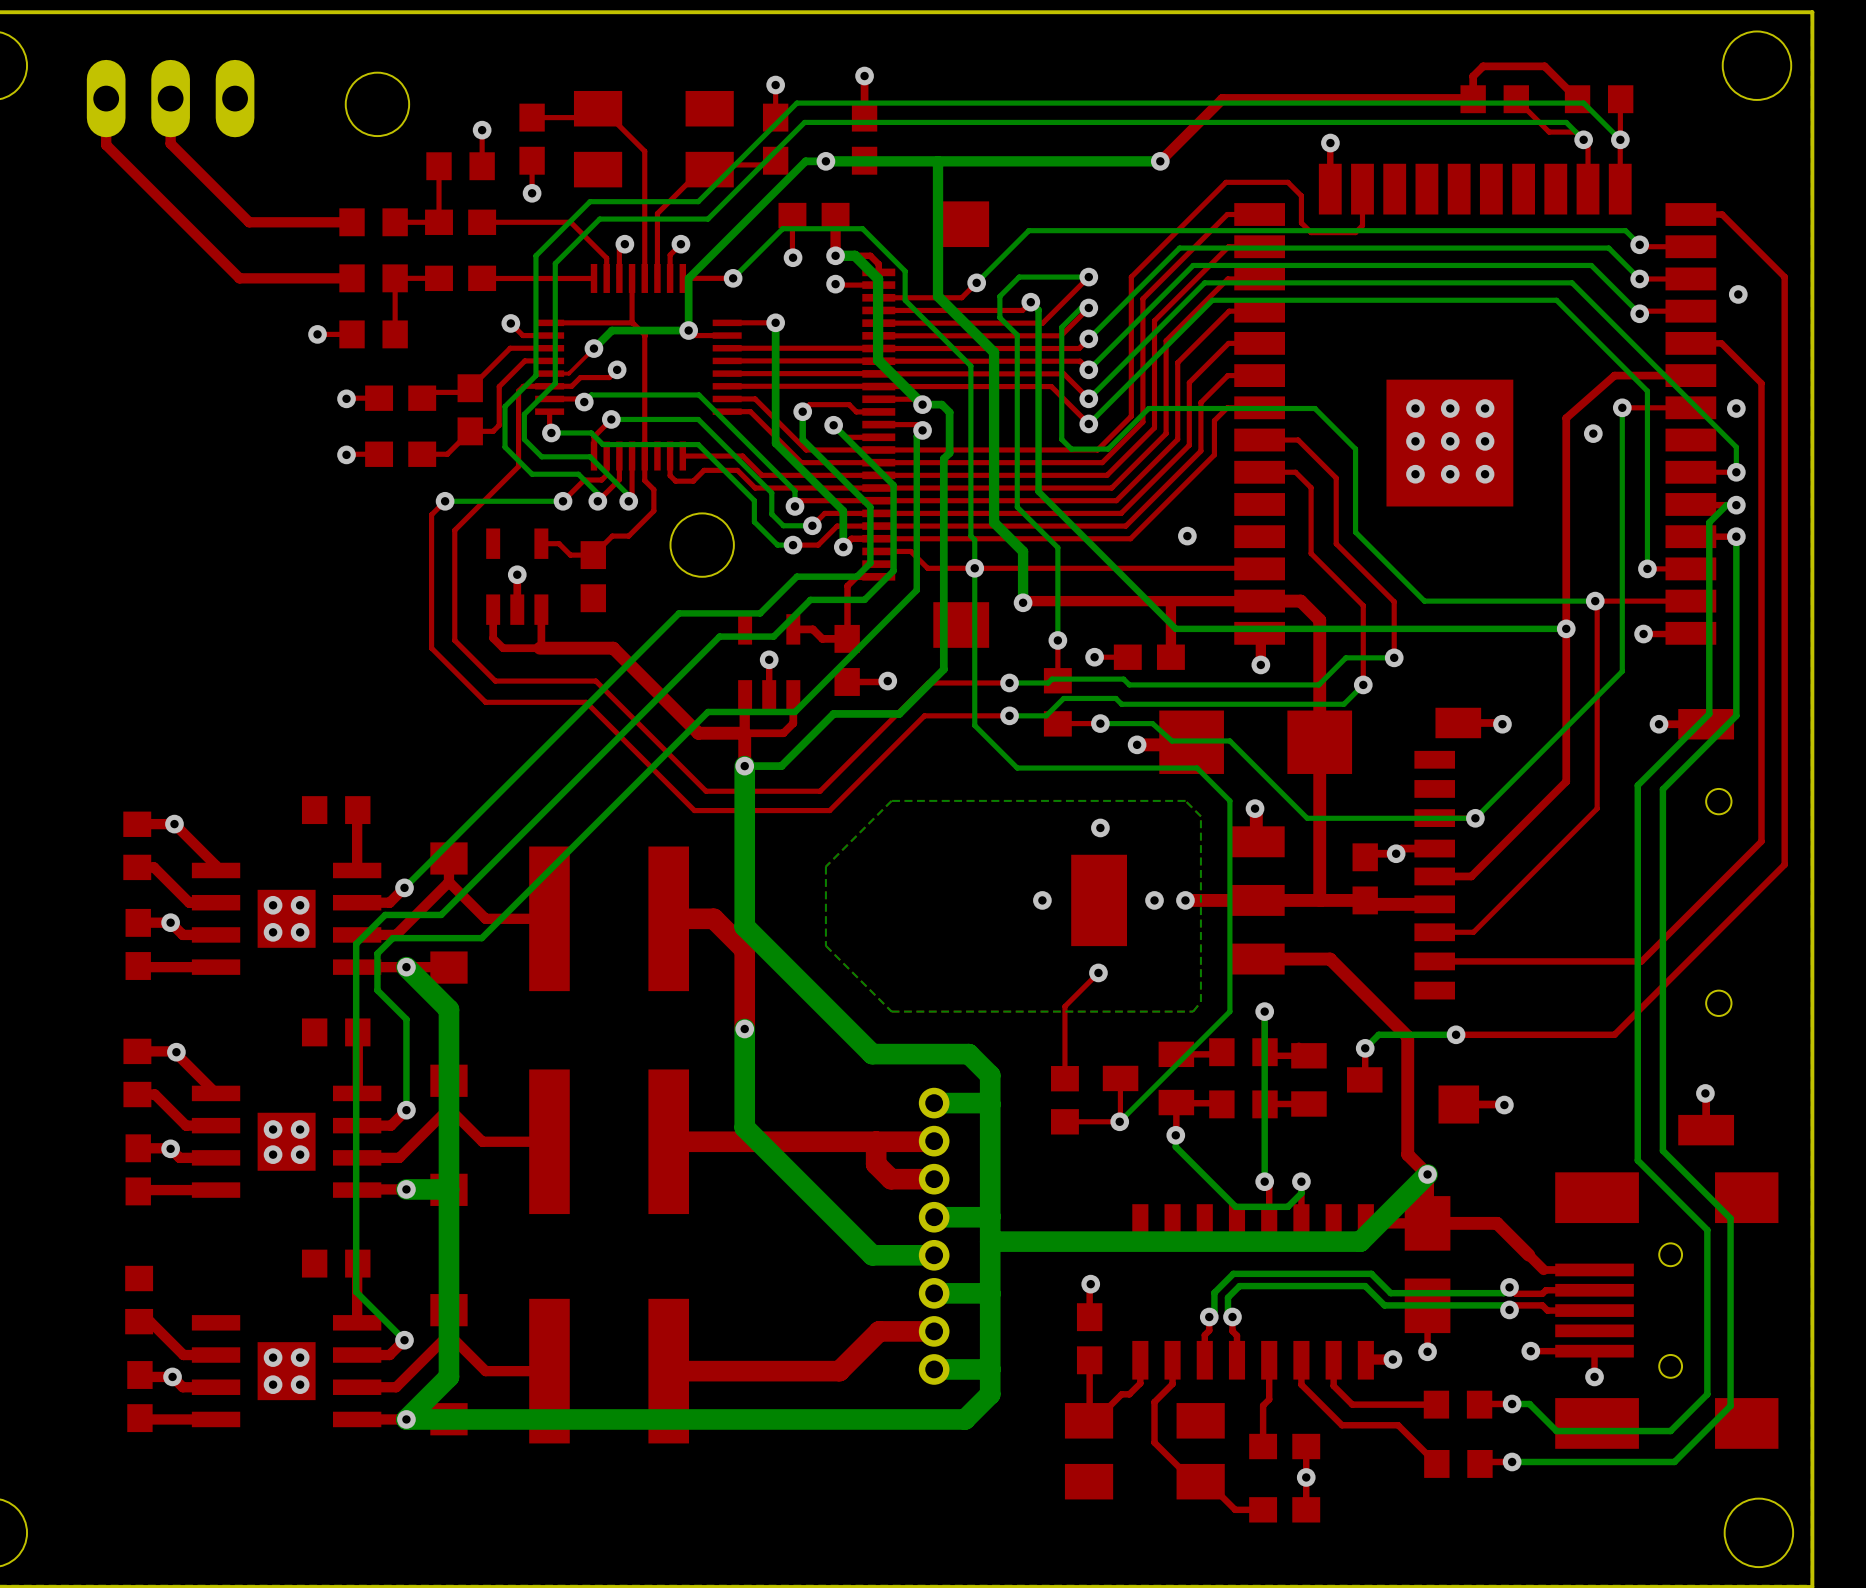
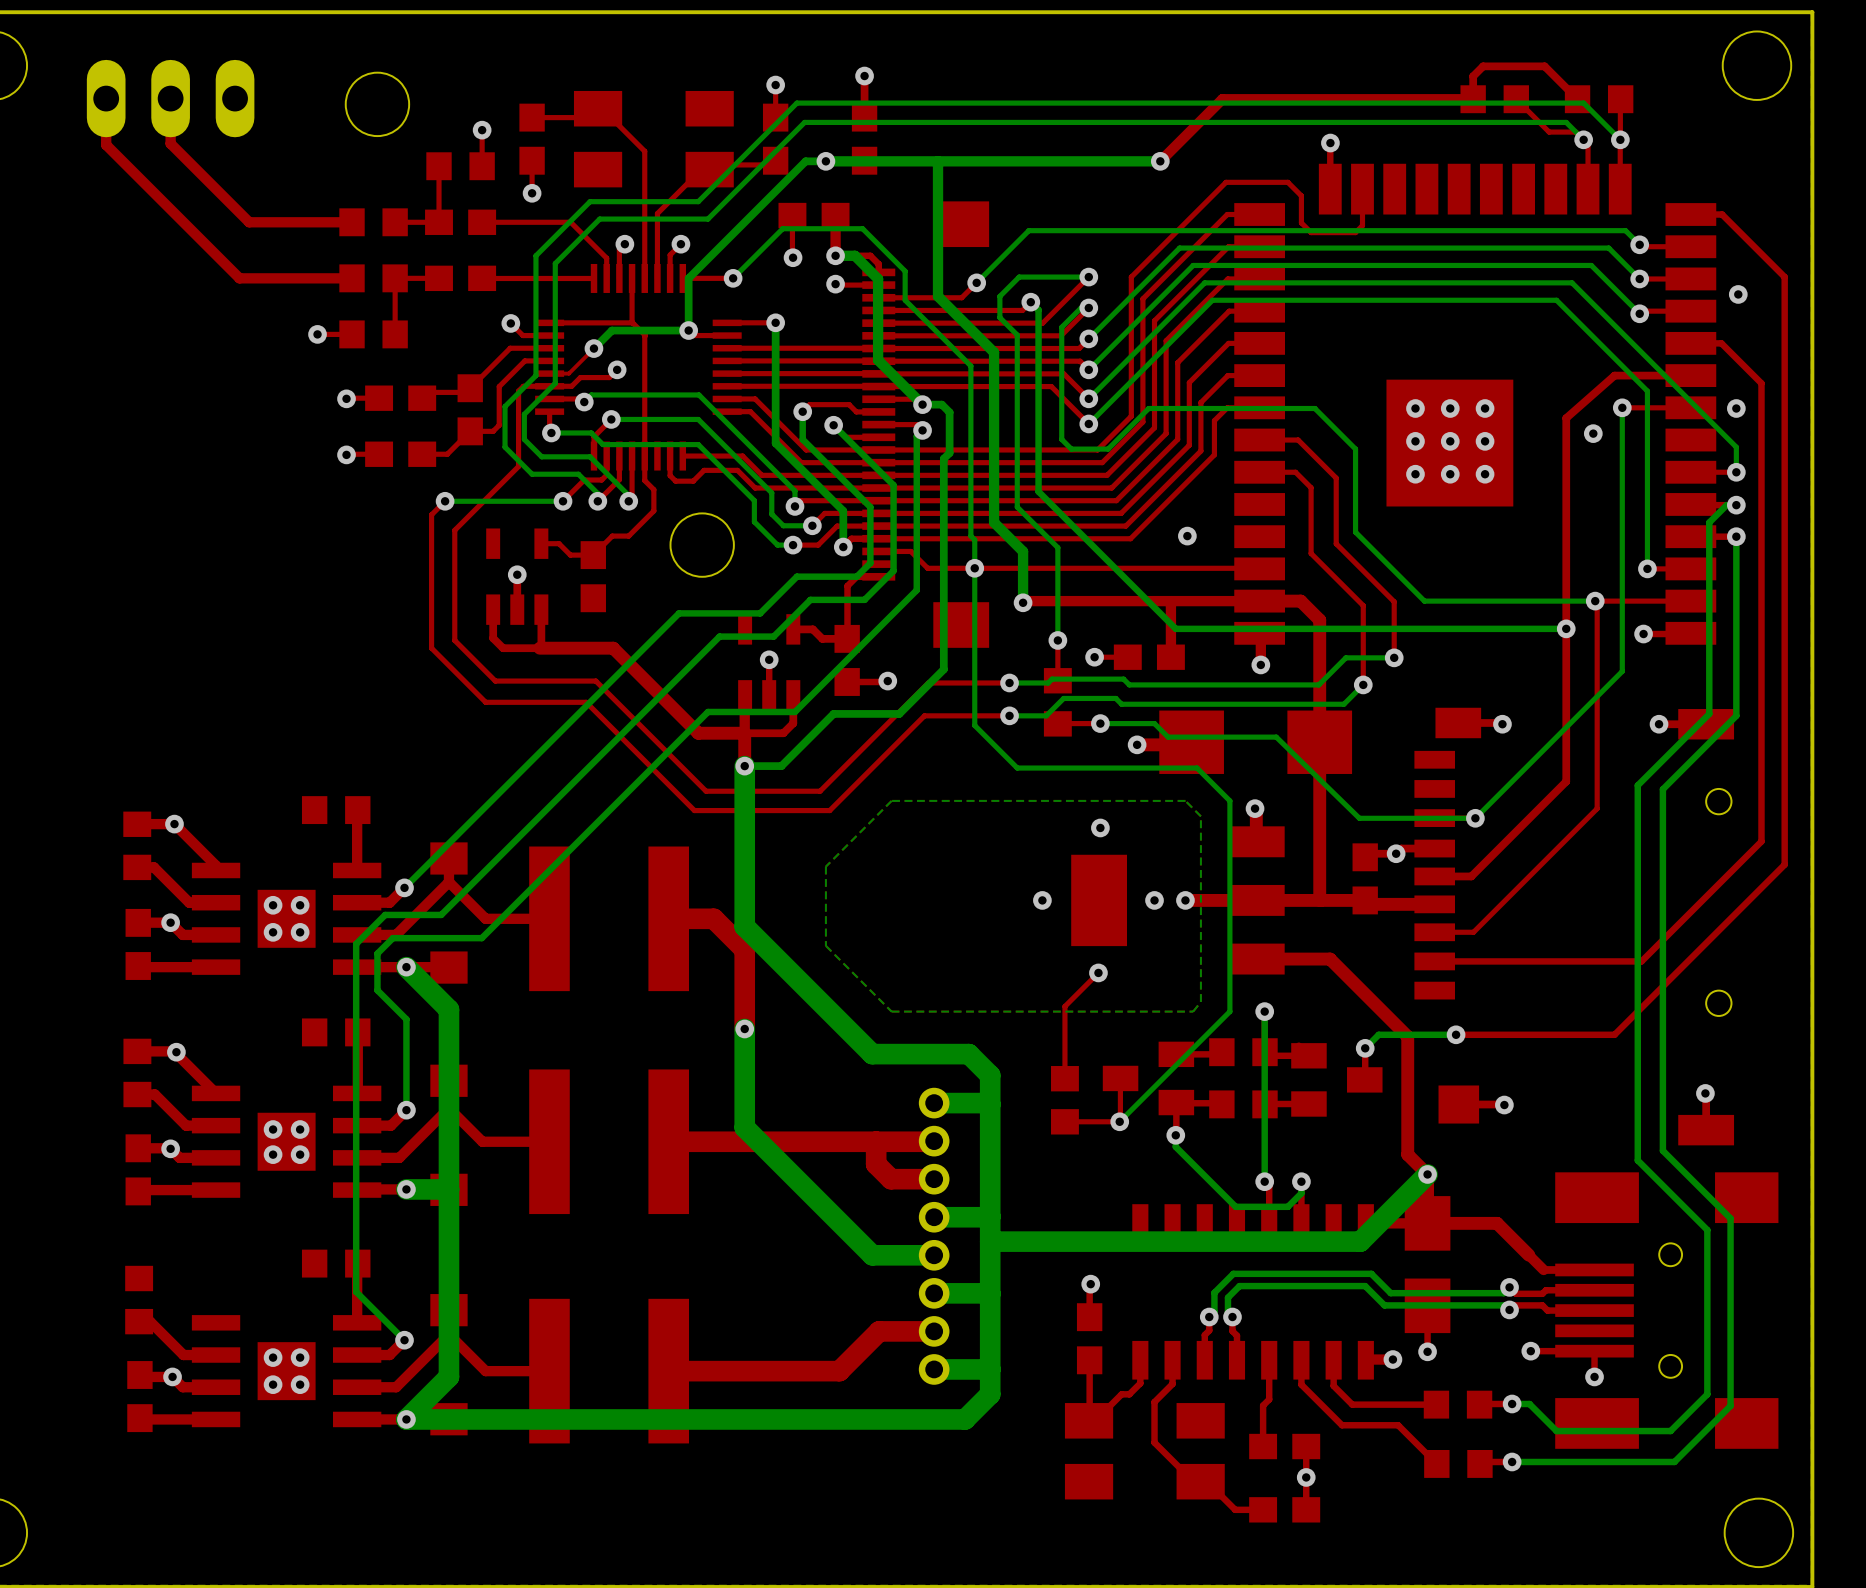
bottom track: (1152, 723) (1171, 740) (1229, 740) (1307, 818) (1359, 818) -> (1152, 723) (1168, 737) (1276, 737) (1359, 818)

